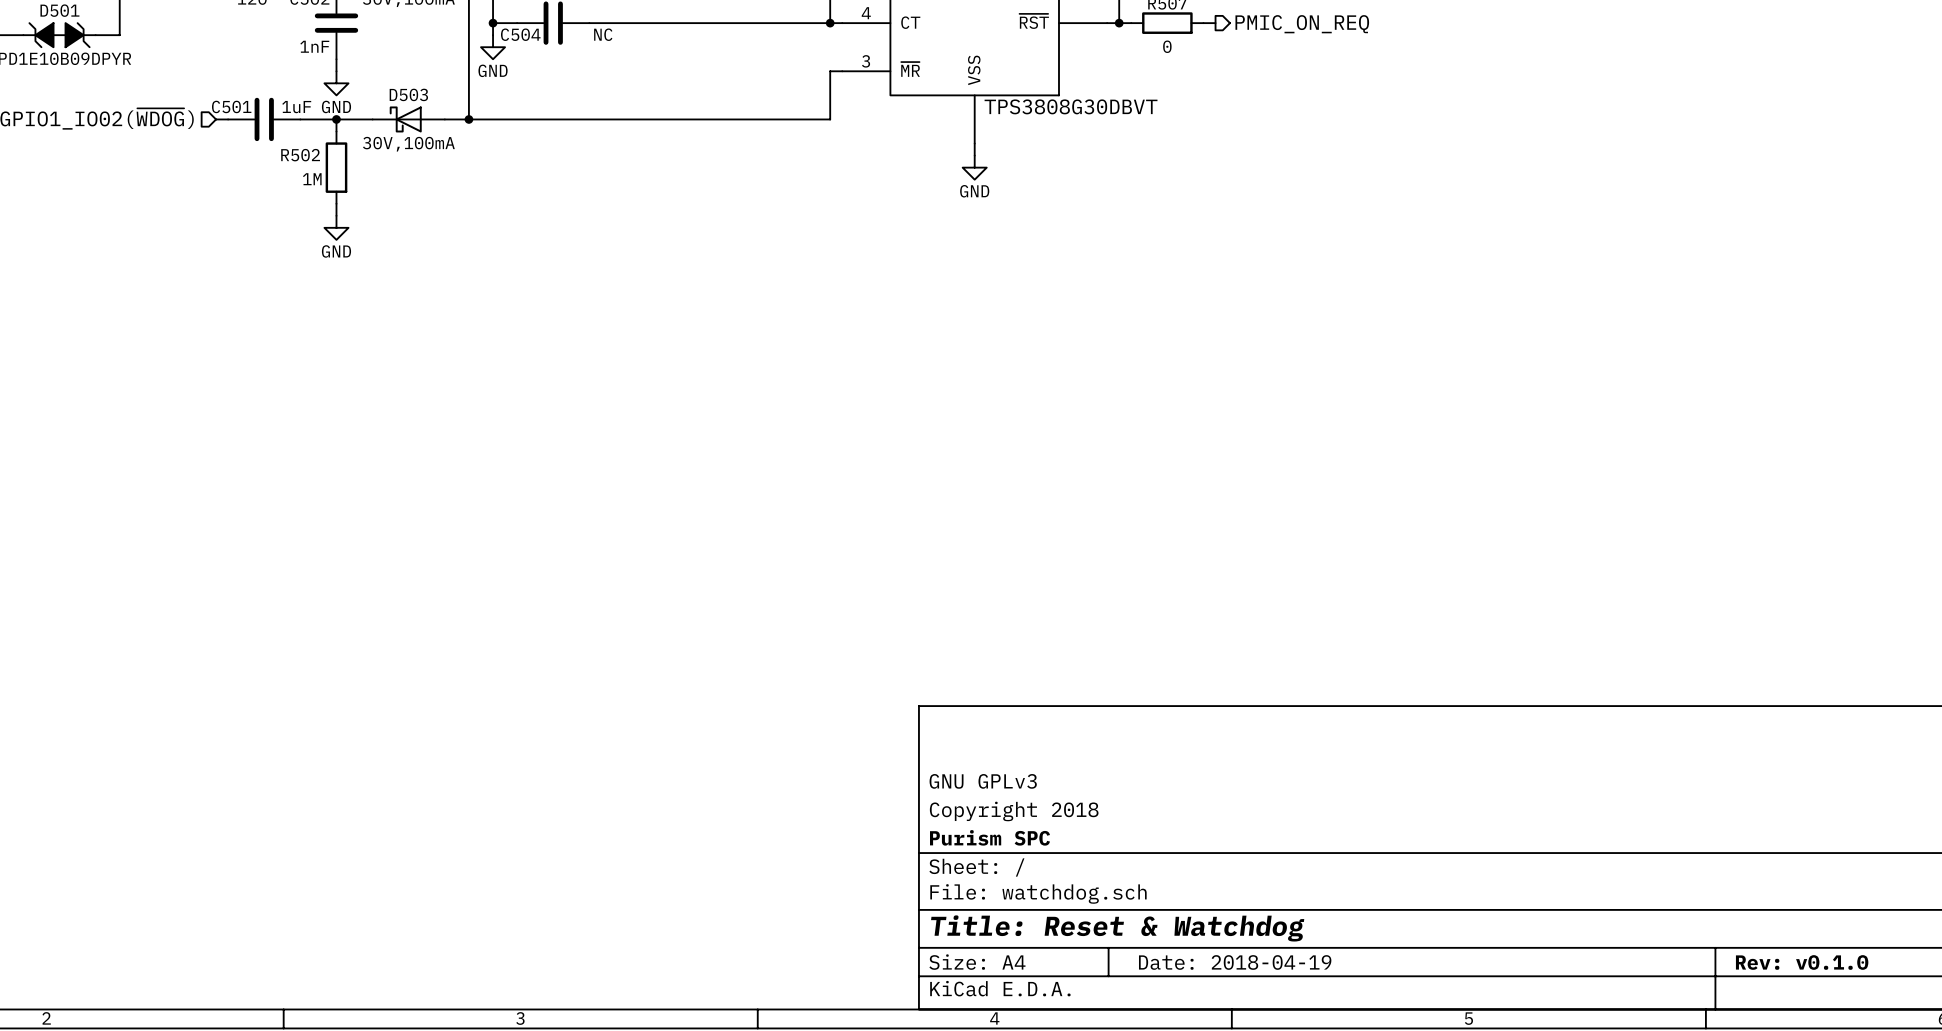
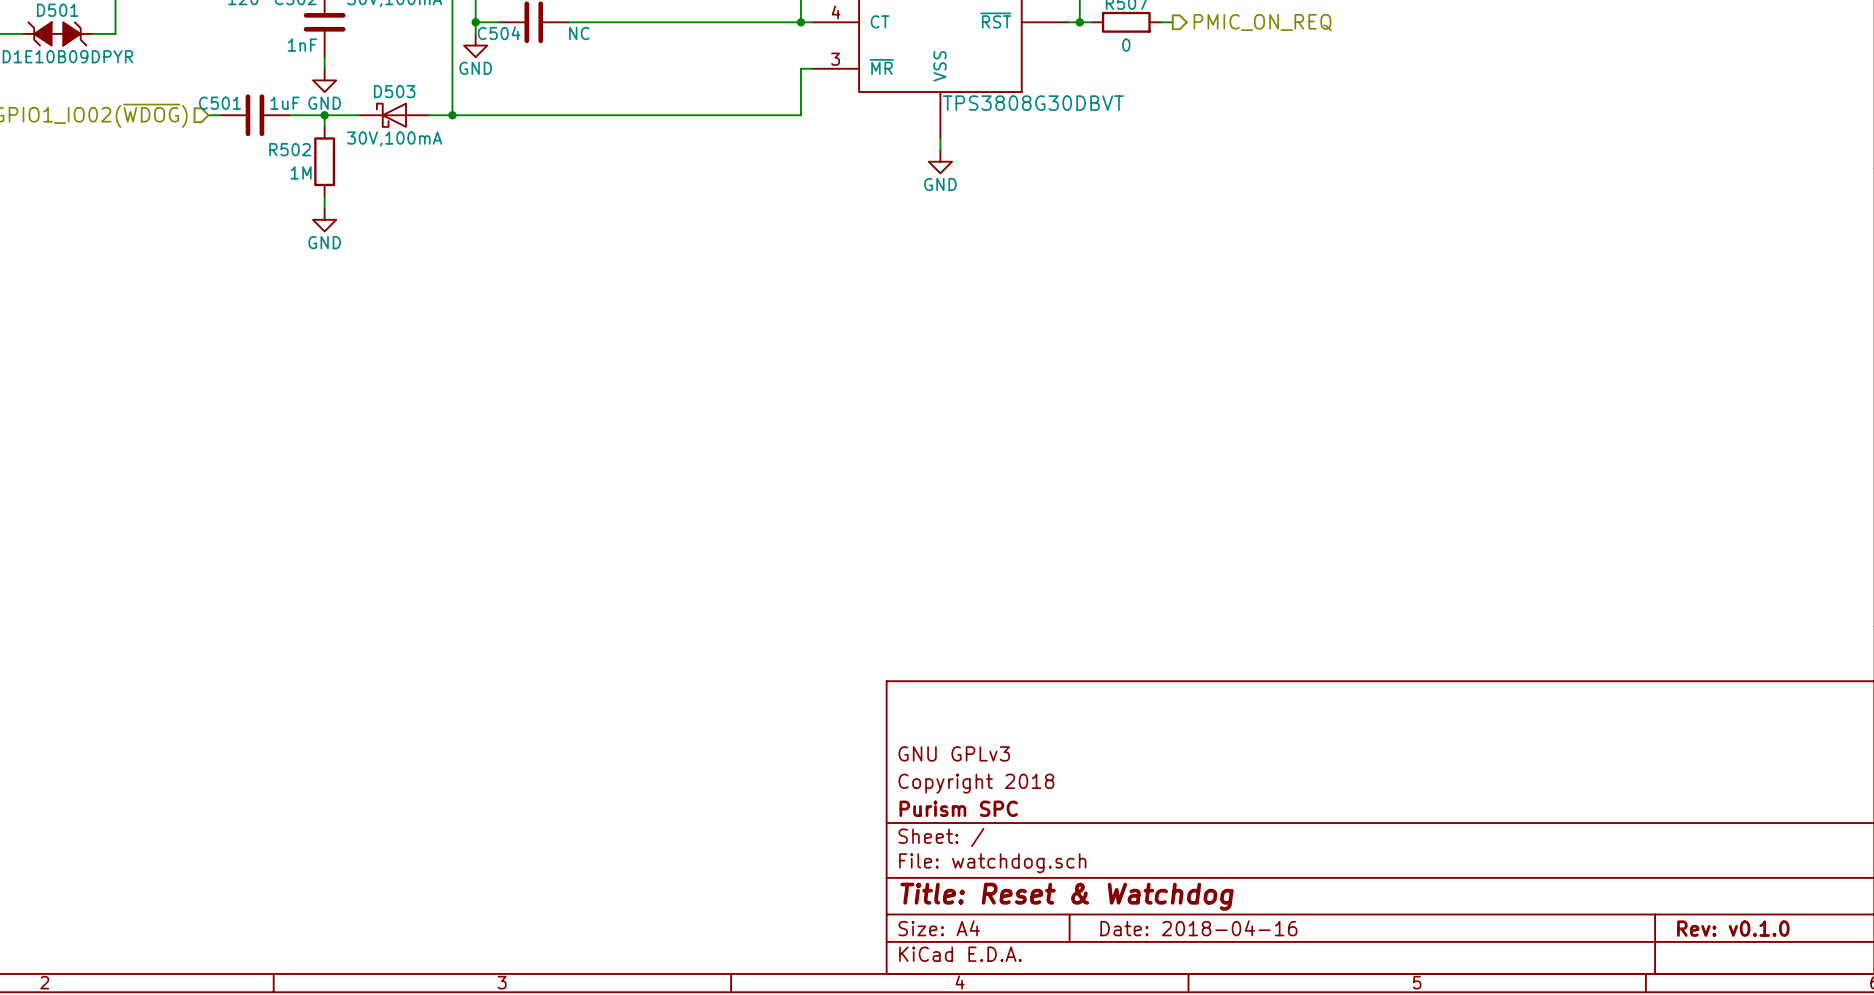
title block: Date: 2018-04-19 (1235, 962) -> Date: 2018-04-16 (1198, 928)

